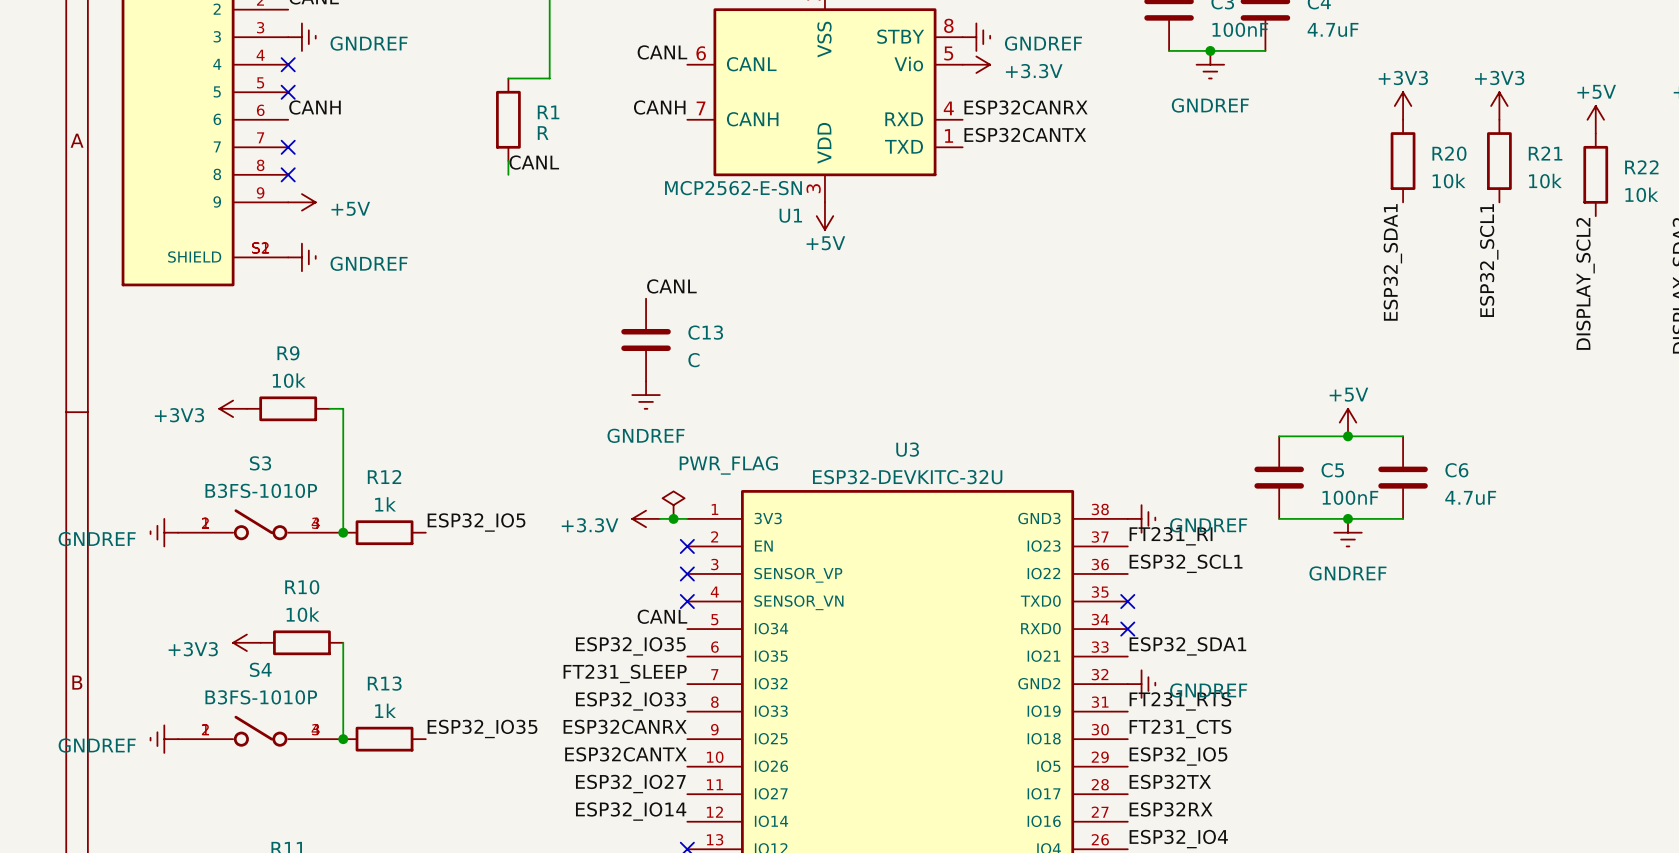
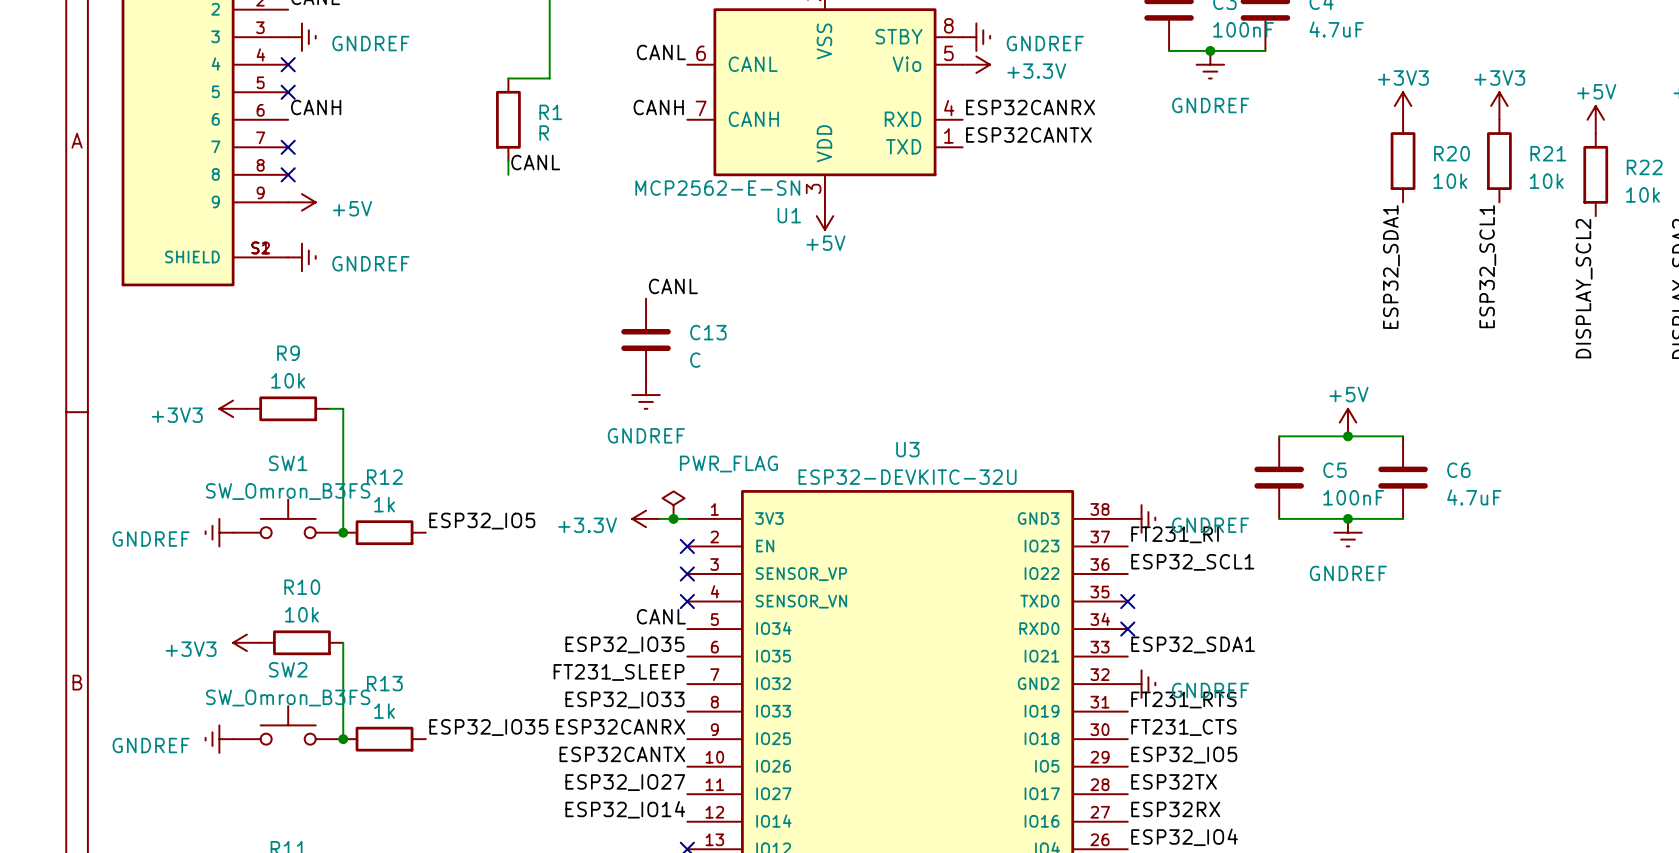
SW1: none -> SW_Omron_B3FS (288, 518)
S3: B3FS-1010P (260, 524) -> none
power symbol position: GNDREF (164, 532) -> GNDREF (219, 532)
SW2: none -> SW_Omron_B3FS (288, 725)
S4: B3FS-1010P (260, 731) -> none
power symbol position: GNDREF (164, 739) -> GNDREF (219, 739)

